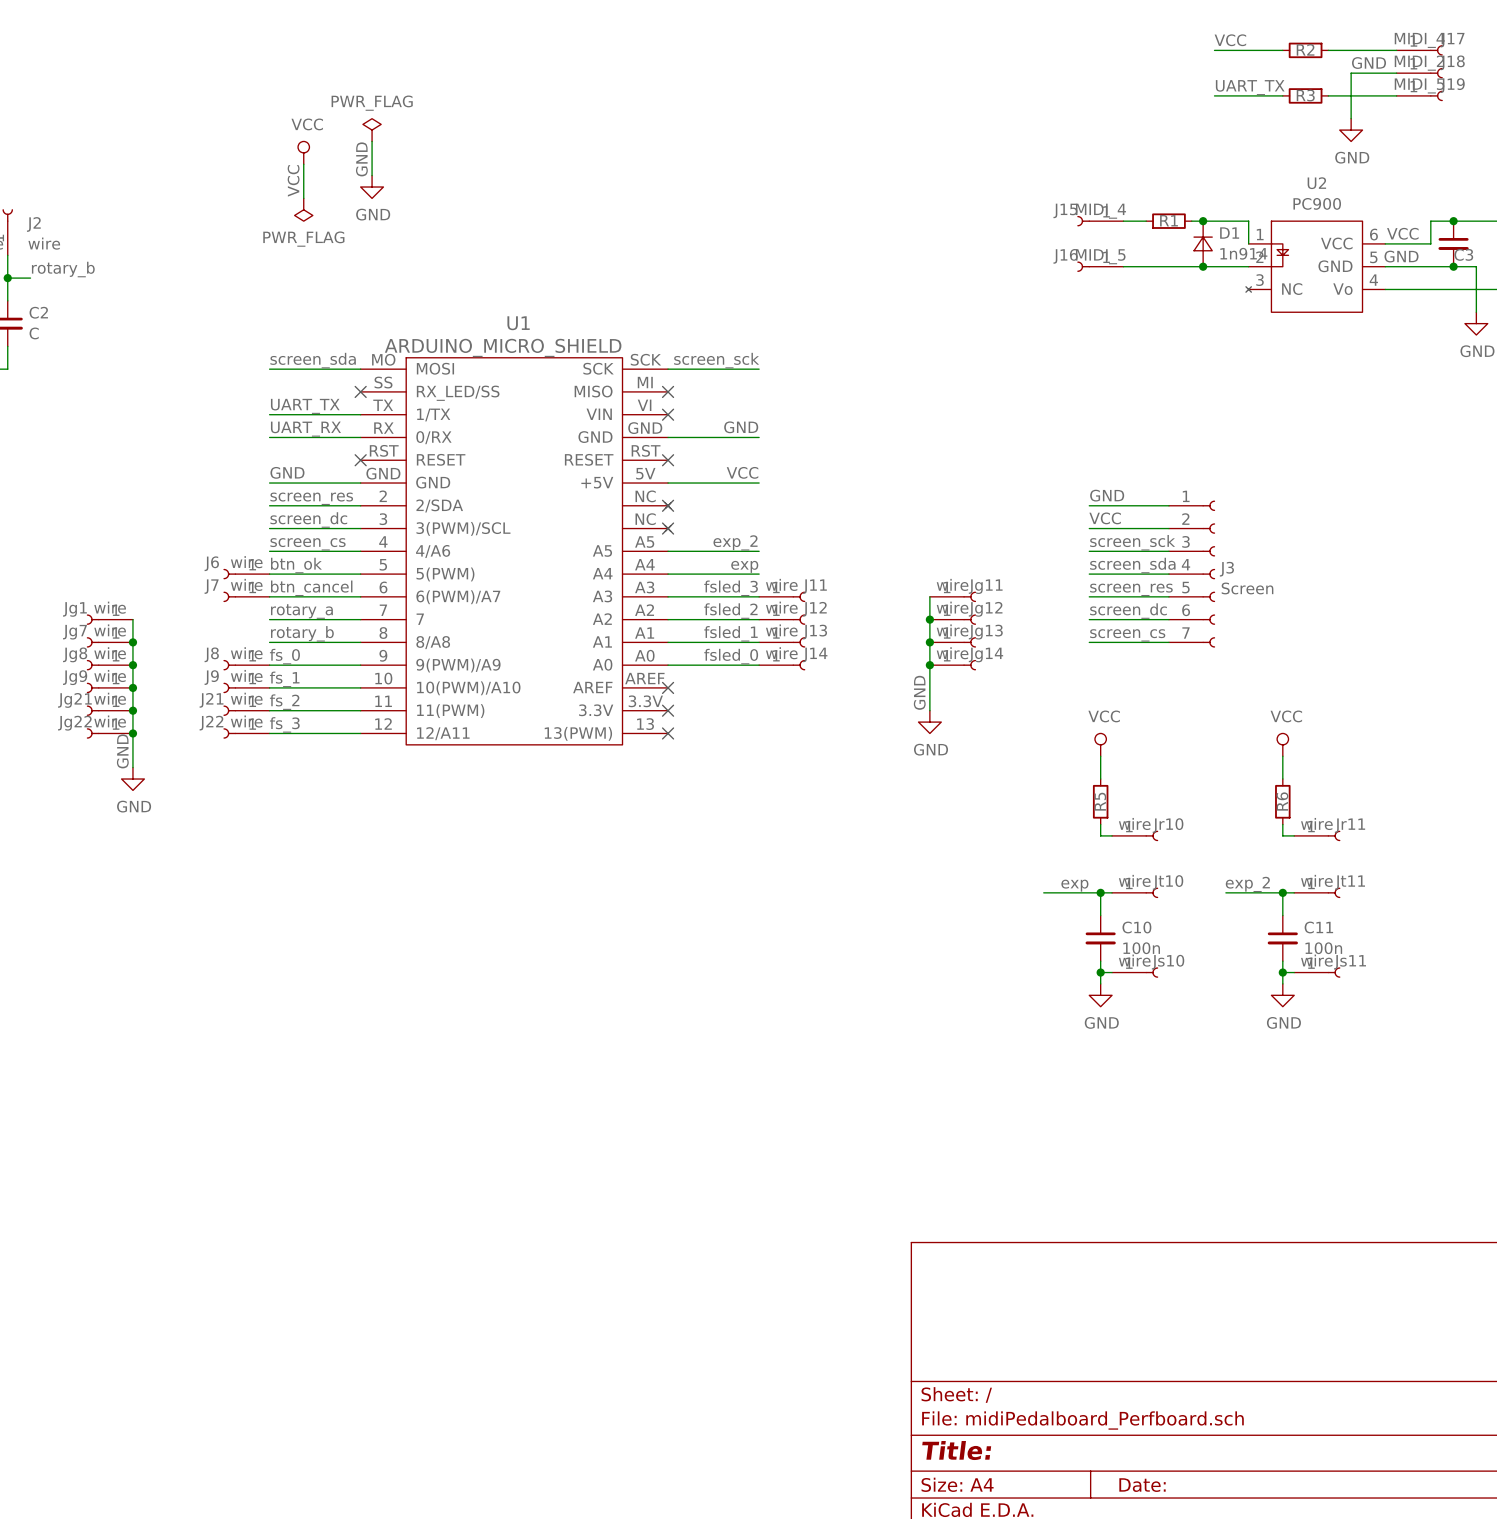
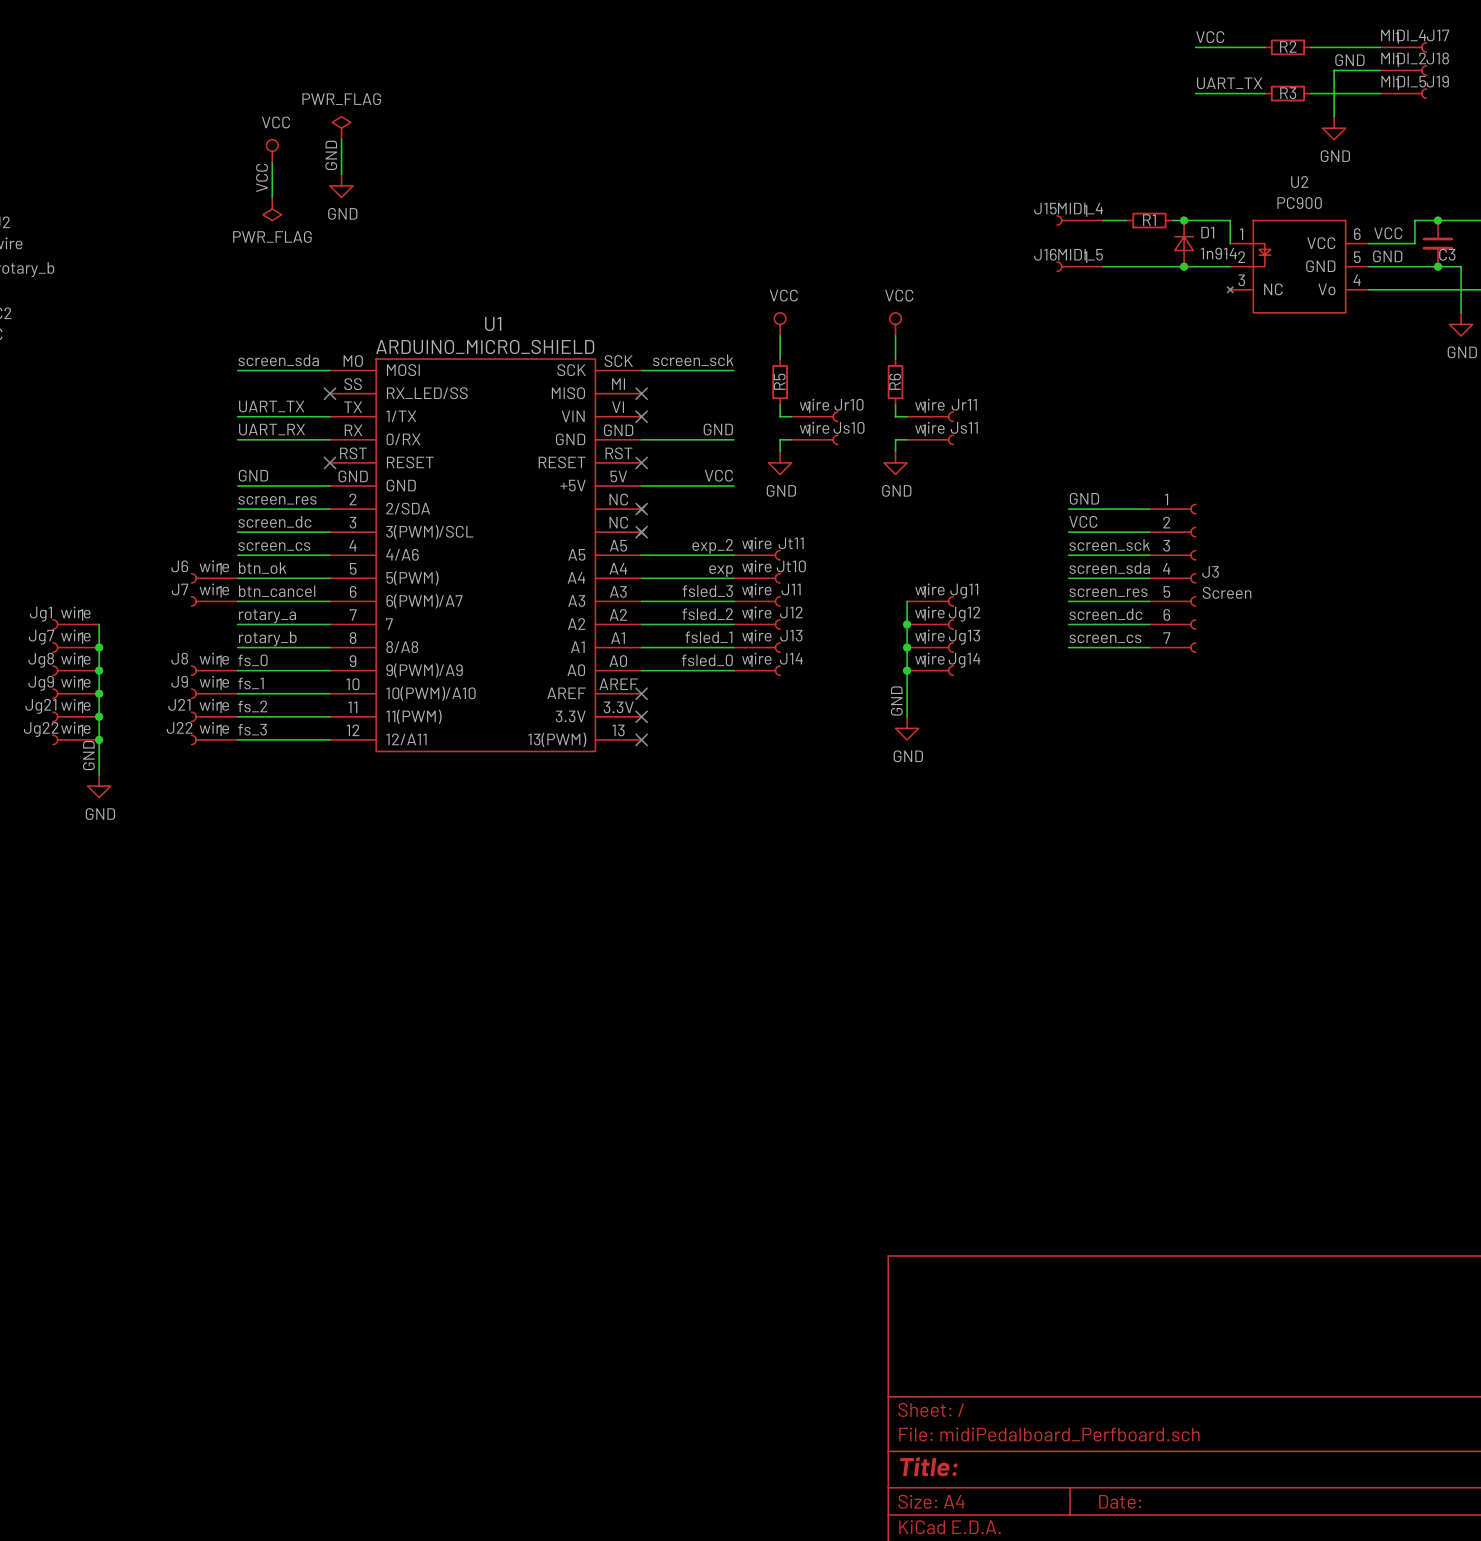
power symbol: none -> VCC (780, 324)
power symbol: none -> VCC (895, 324)
wire: none -> (780, 335) (780, 359)
wire: none -> (895, 335) (895, 359)
wire: none -> (780, 405) (780, 416) (791, 416)
wire: none -> (895, 405) (895, 416) (907, 416)
wire: none -> (791, 439) (780, 439) (780, 451)
wire: none -> (907, 439) (895, 439) (895, 451)
power symbol: none -> GND (780, 462)
power symbol: none -> GND (895, 462)
power symbol: VCC (1100, 744) -> none
power symbol: VCC (1282, 744) -> none
wire: (1100, 756) (1100, 779) -> none
wire: (1282, 756) (1282, 779) -> none
R5 position: (1100, 801) -> (780, 382)
R6 position: (1282, 801) -> (895, 382)
wire: (1100, 824) (1100, 835) (1112, 835) -> none
wire: (1282, 824) (1282, 835) (1294, 835) -> none
Jr10 position: (1135, 835) -> (815, 416)
Jr11 position: (1317, 835) -> (930, 416)
label: exp_2 (1247, 884) -> none
label: exp (1074, 885) -> none
wire: (1043, 892) (1112, 892) -> none
wire: (1100, 892) (1100, 915) -> none
junction: (1100, 892) -> none
Jt10 position: (1135, 892) -> (757, 578)
wire: (1225, 892) (1294, 892) -> none
wire: (1282, 892) (1282, 915) -> none
junction: (1282, 892) -> none
Jt11 position: (1317, 892) -> (757, 555)
C10: 100n (1100, 938) -> none
C11: 100n (1282, 938) -> none
wire: (1100, 961) (1100, 983) -> none
wire: (1282, 961) (1282, 983) -> none
wire: (1100, 972) (1112, 972) -> none
junction: (1100, 972) -> none
Js10 position: (1135, 972) -> (815, 439)
wire: (1282, 972) (1294, 972) -> none
junction: (1282, 972) -> none
Js11 position: (1317, 972) -> (930, 439)
power symbol: GND (1100, 995) -> none
power symbol: GND (1282, 995) -> none

